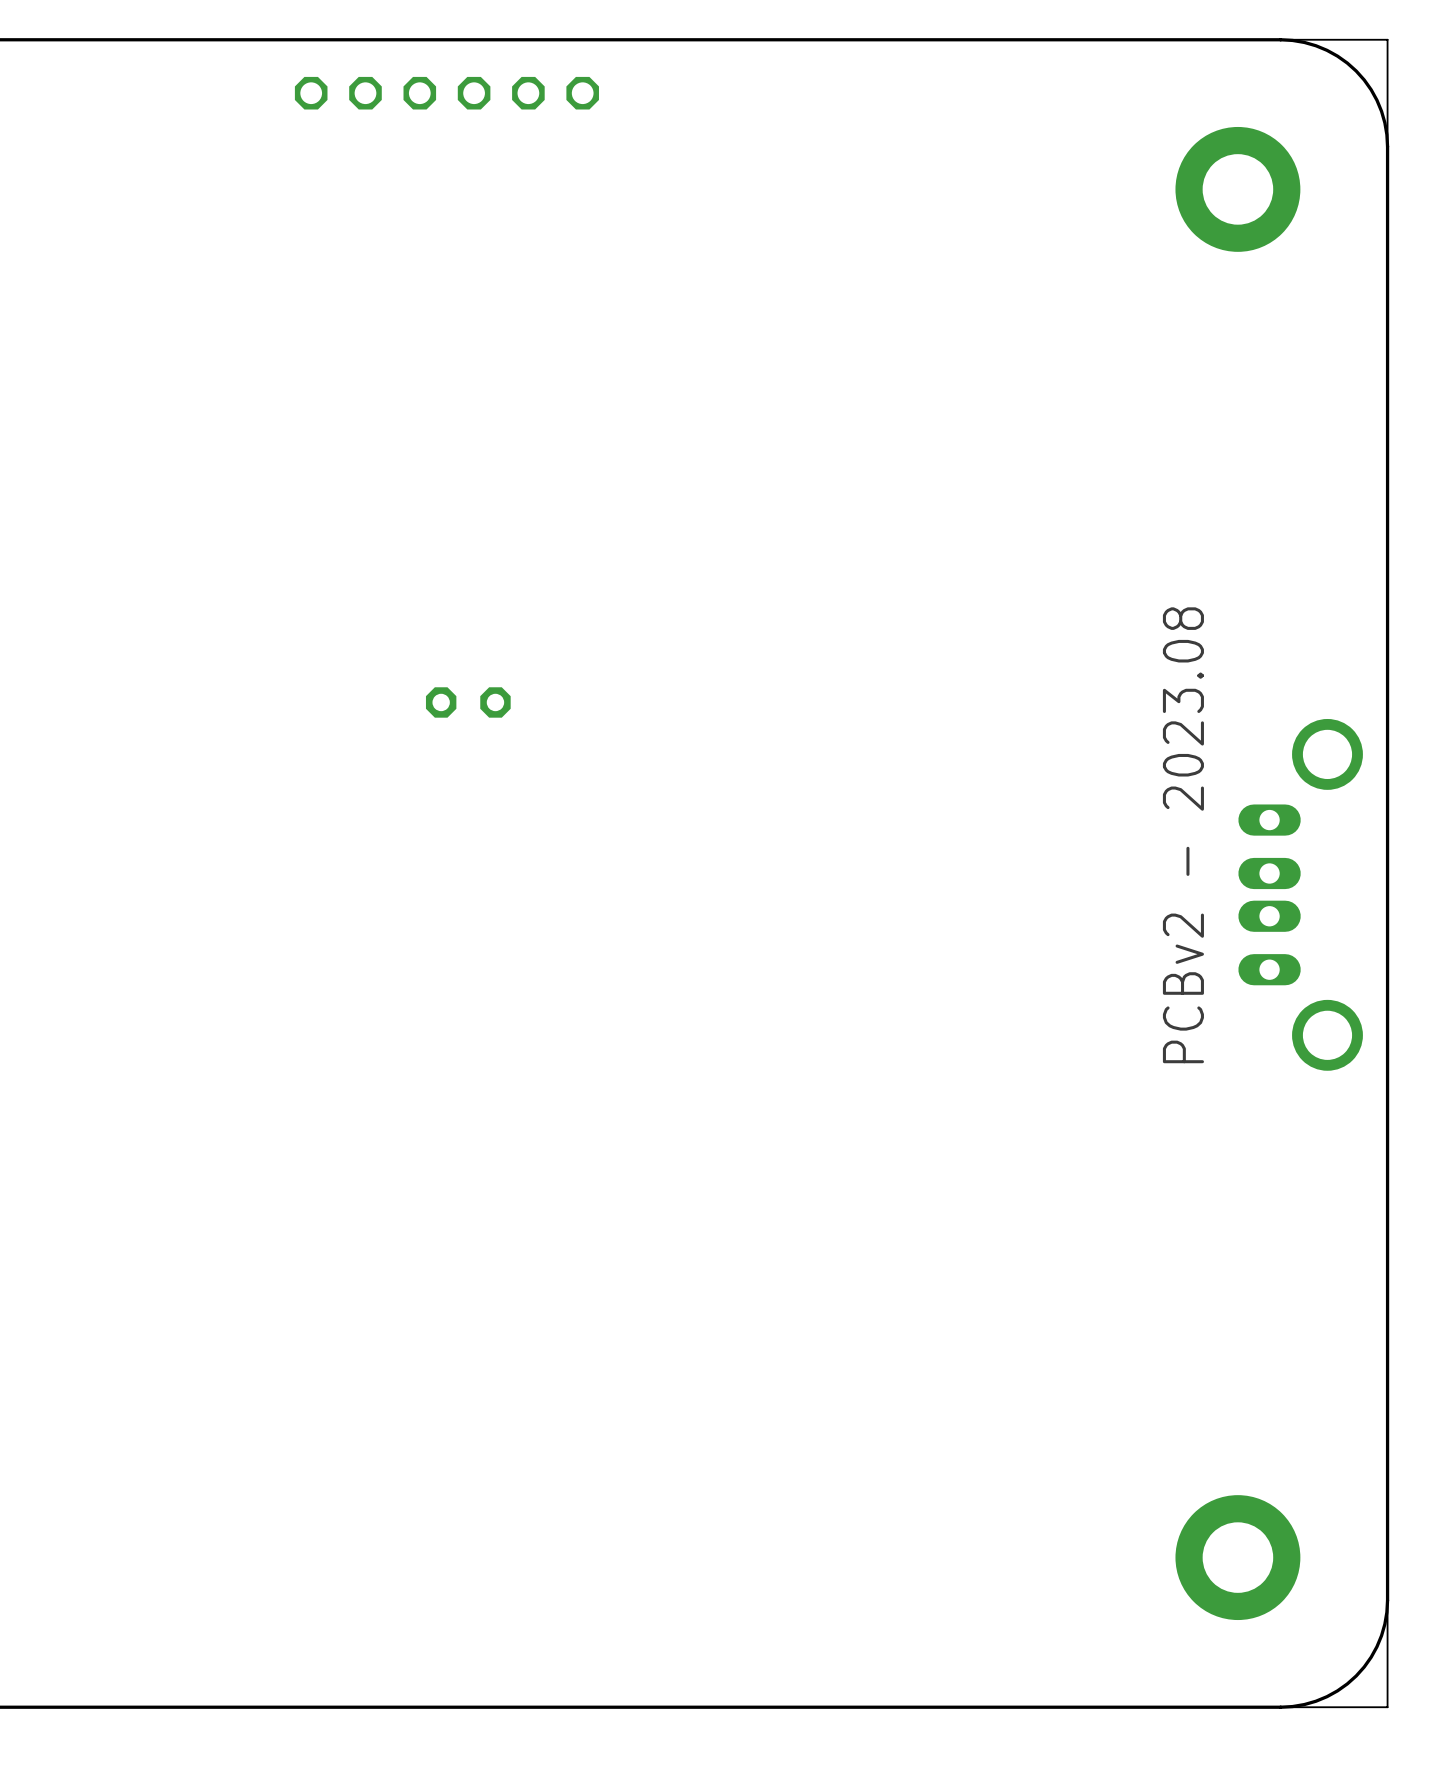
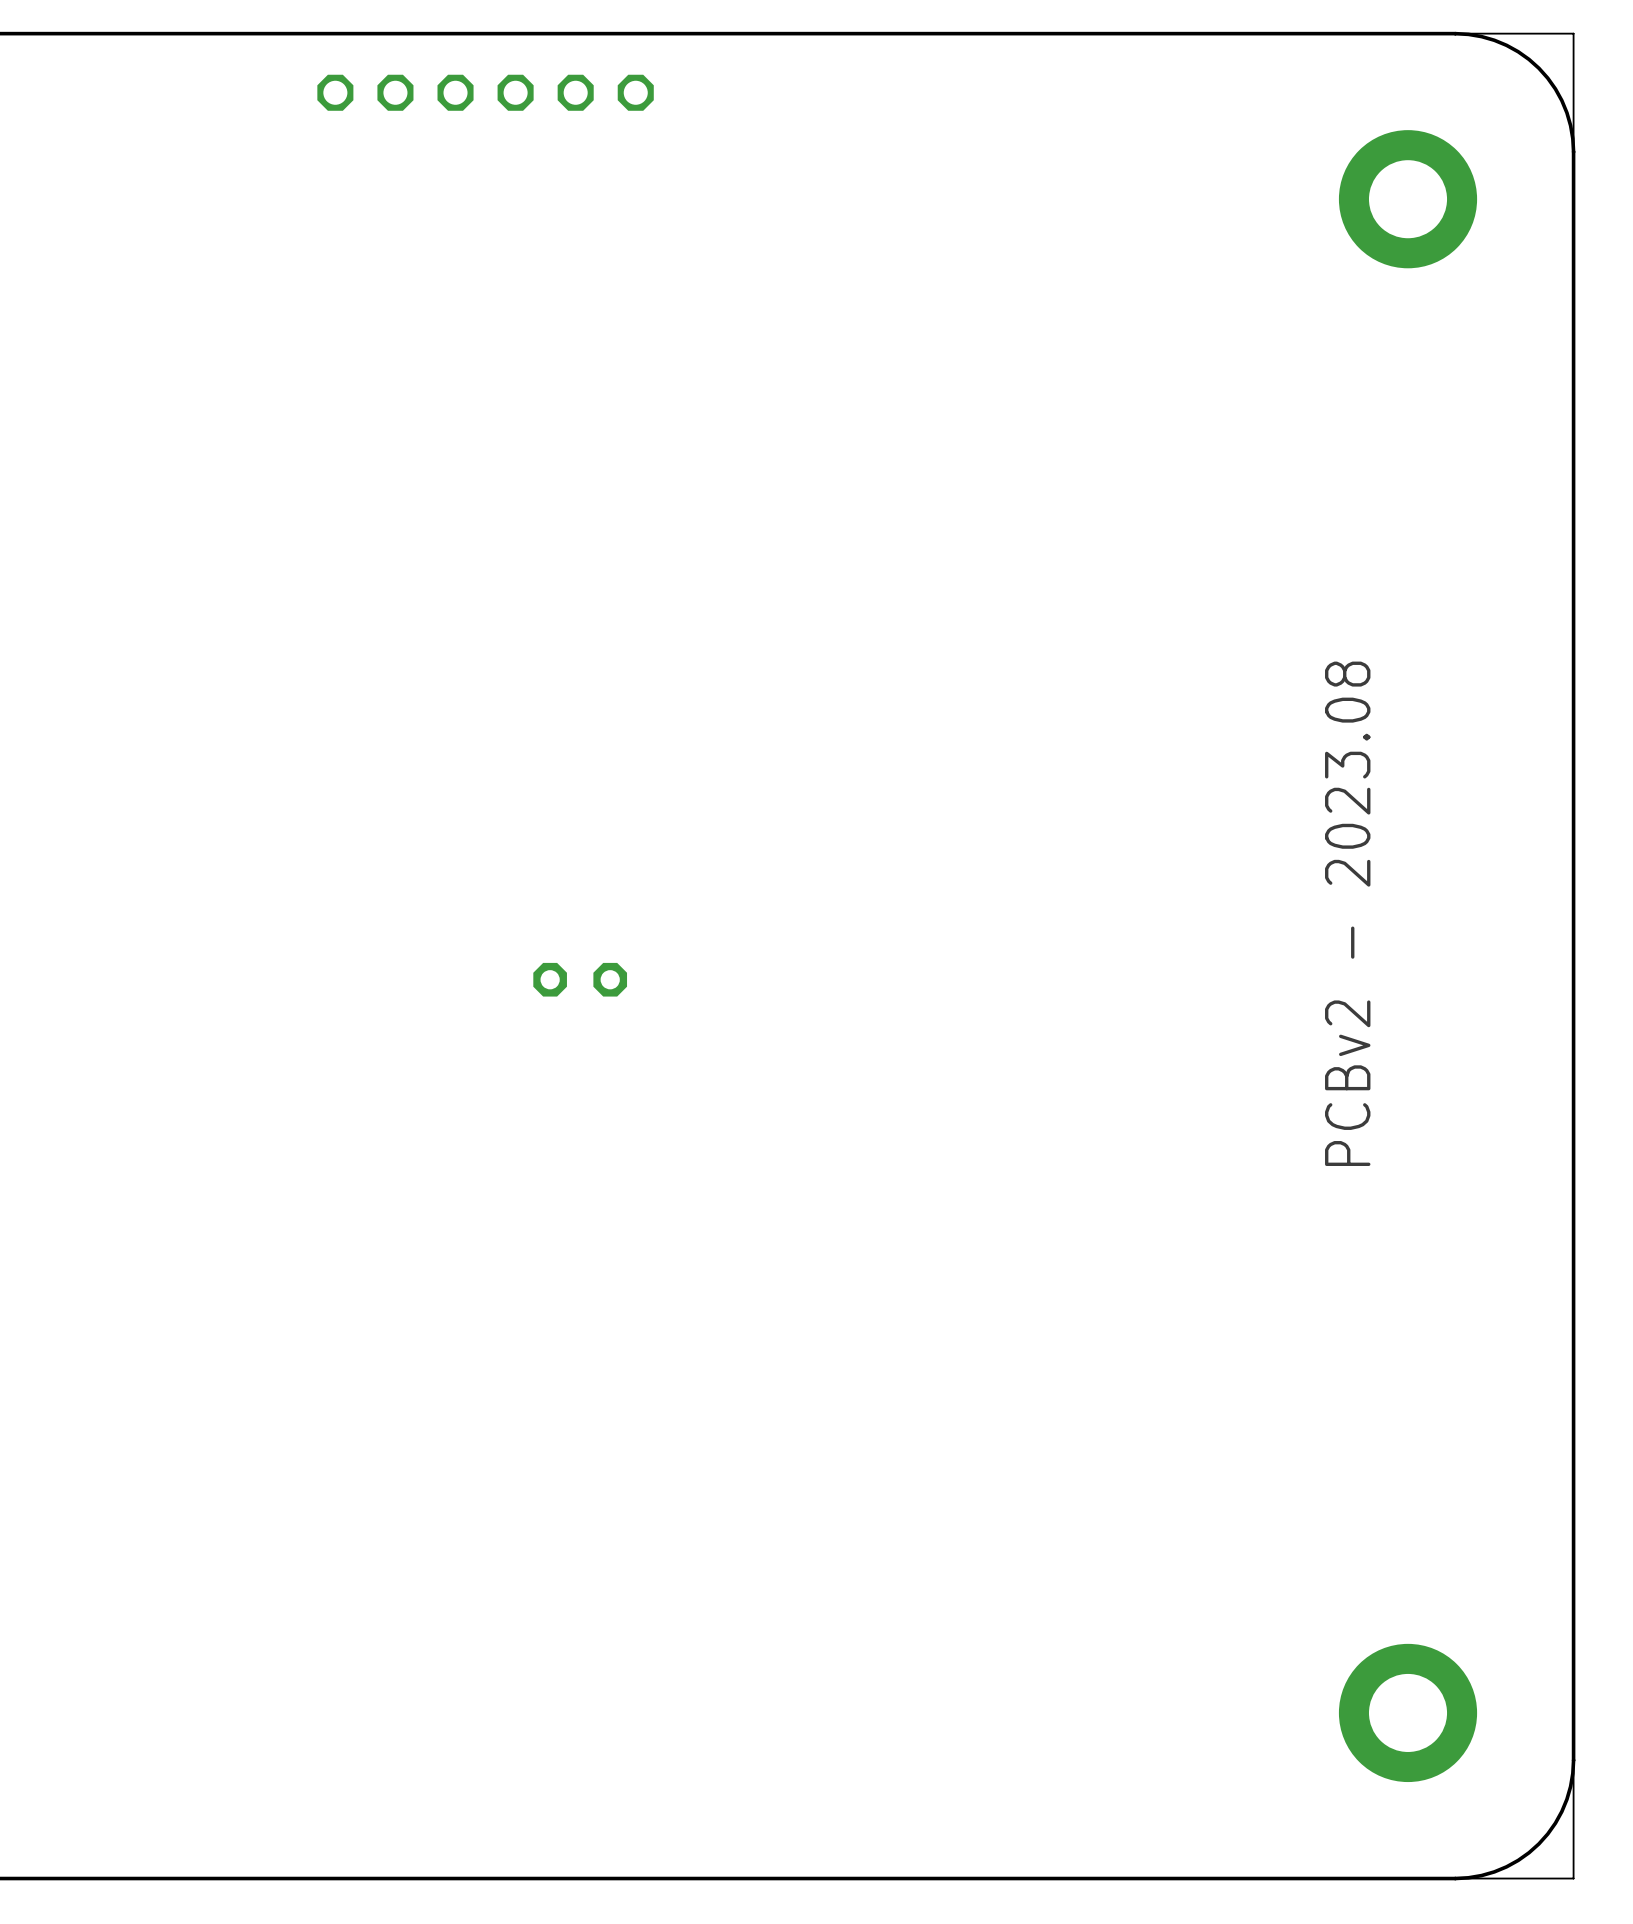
part position: (446, 93) -> (485, 92)
part position: (468, 702) -> (580, 979)
part: (1300, 894) -> none

